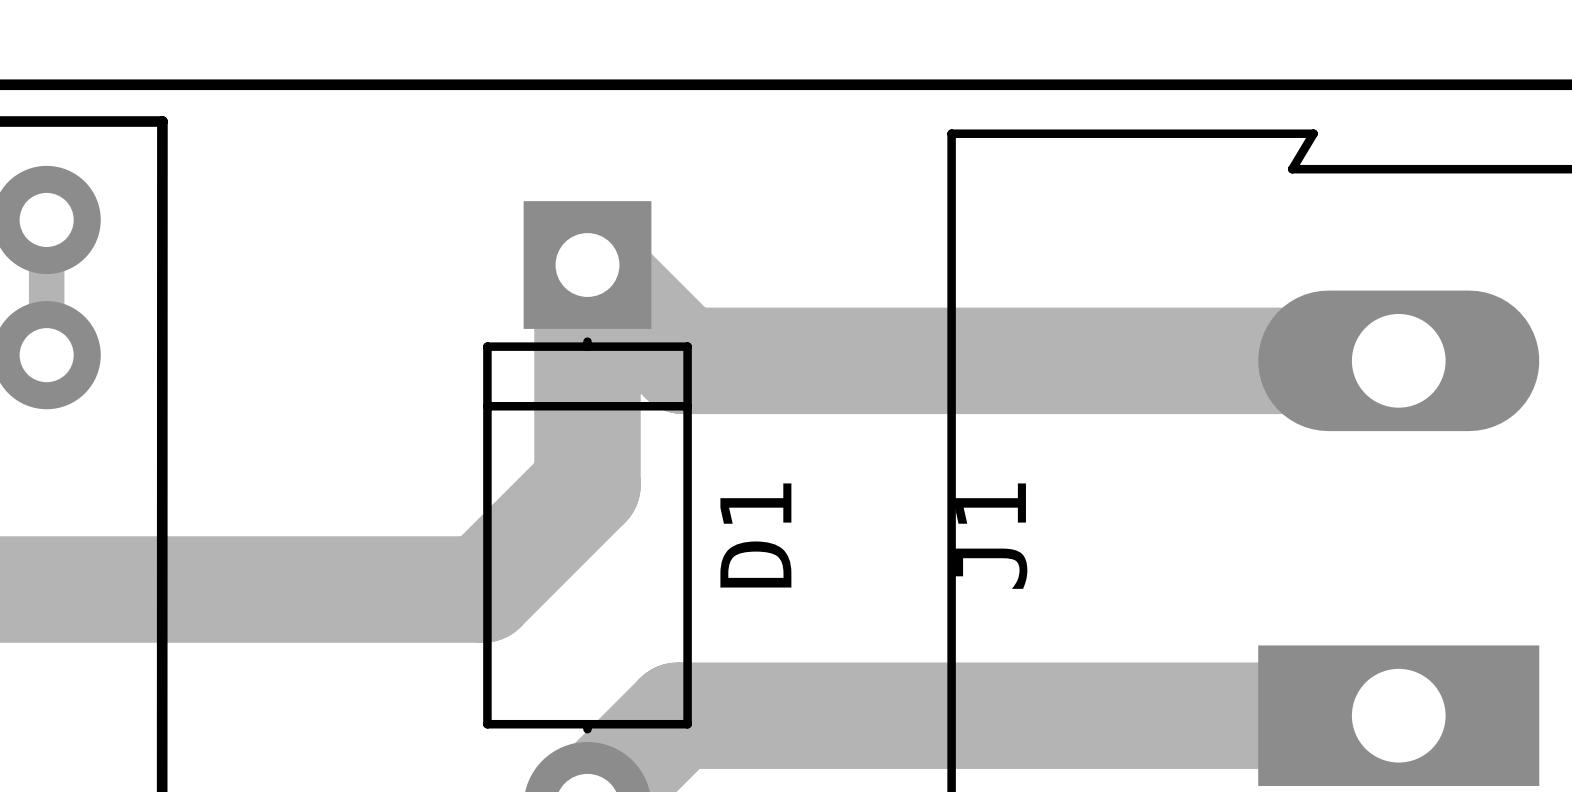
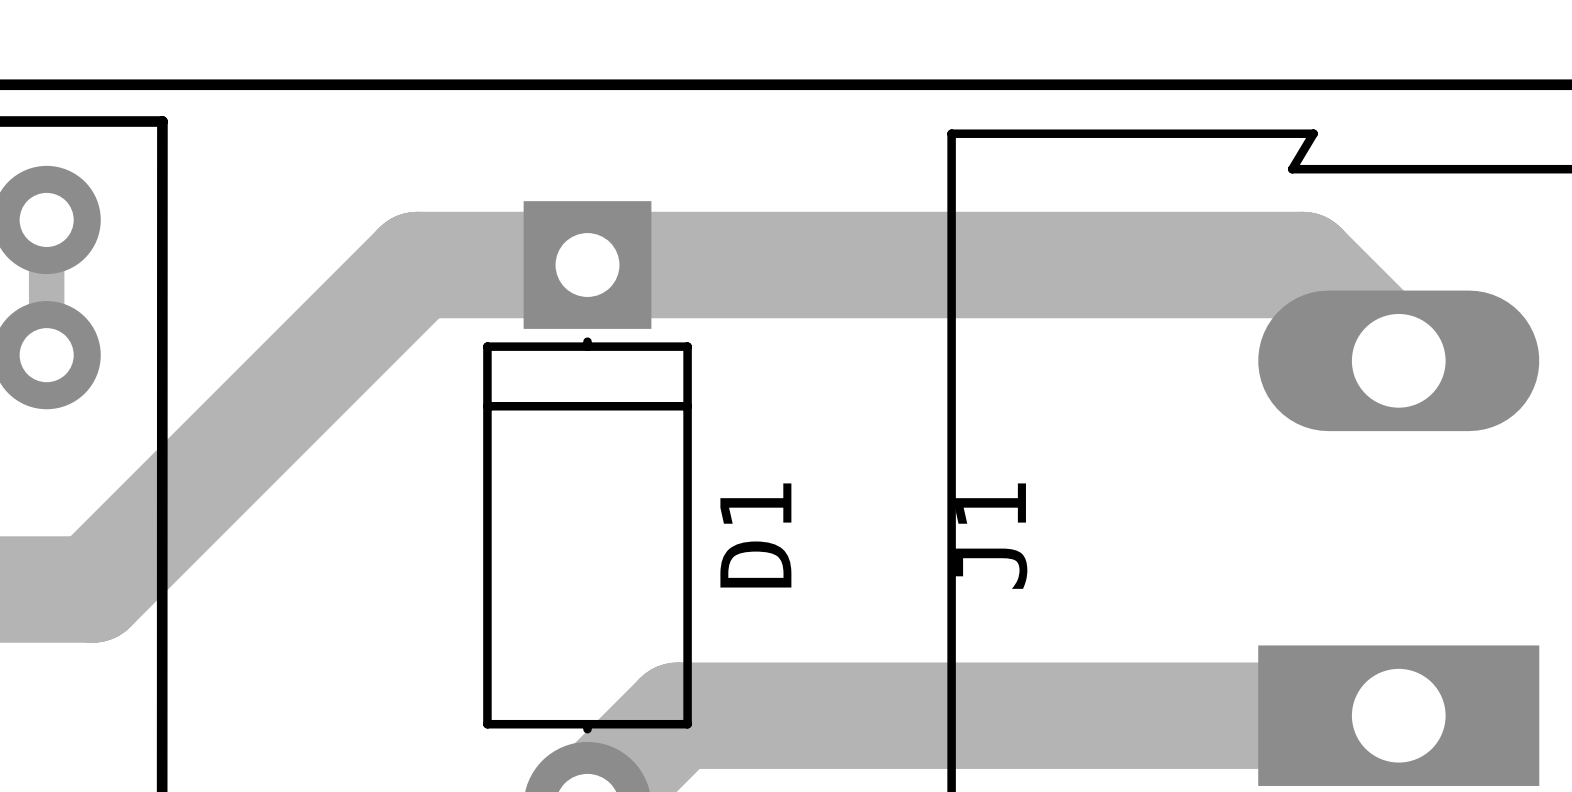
track: (1398, 360) (683, 360) (587, 265) (587, 485) (483, 589) (92, 589) -> (1398, 360) (1302, 265) (417, 265) (92, 589)

